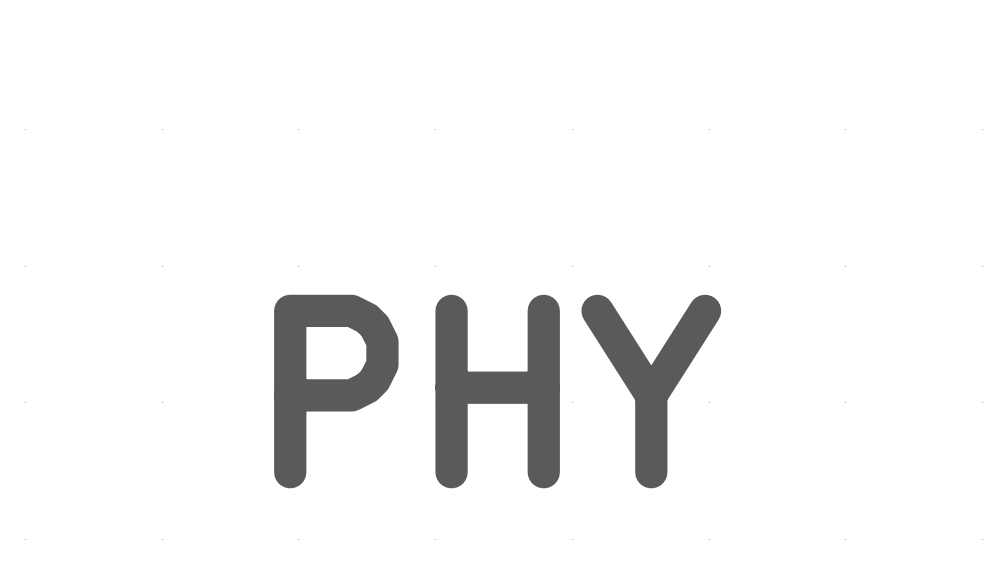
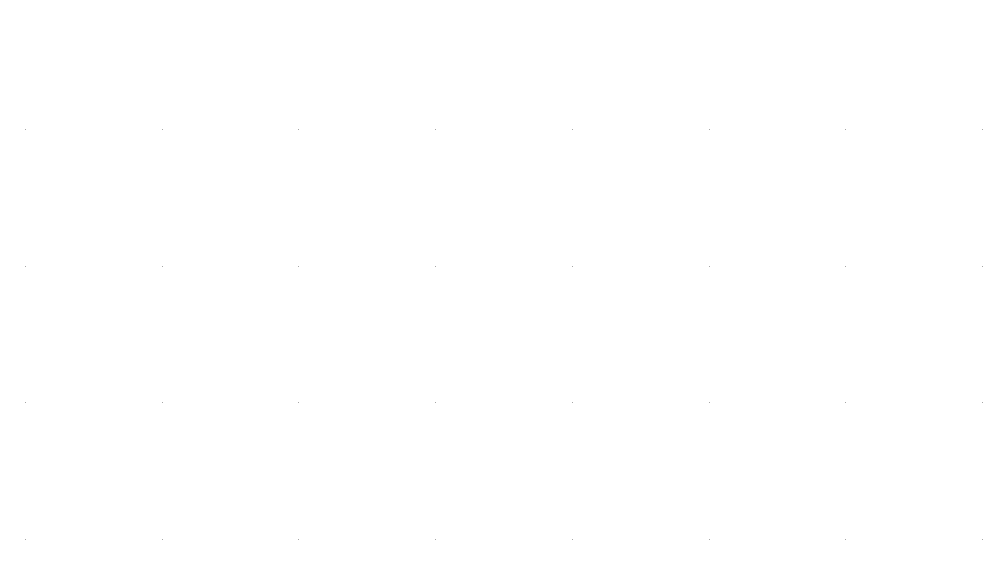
text: PHY (497, 391) -> none

